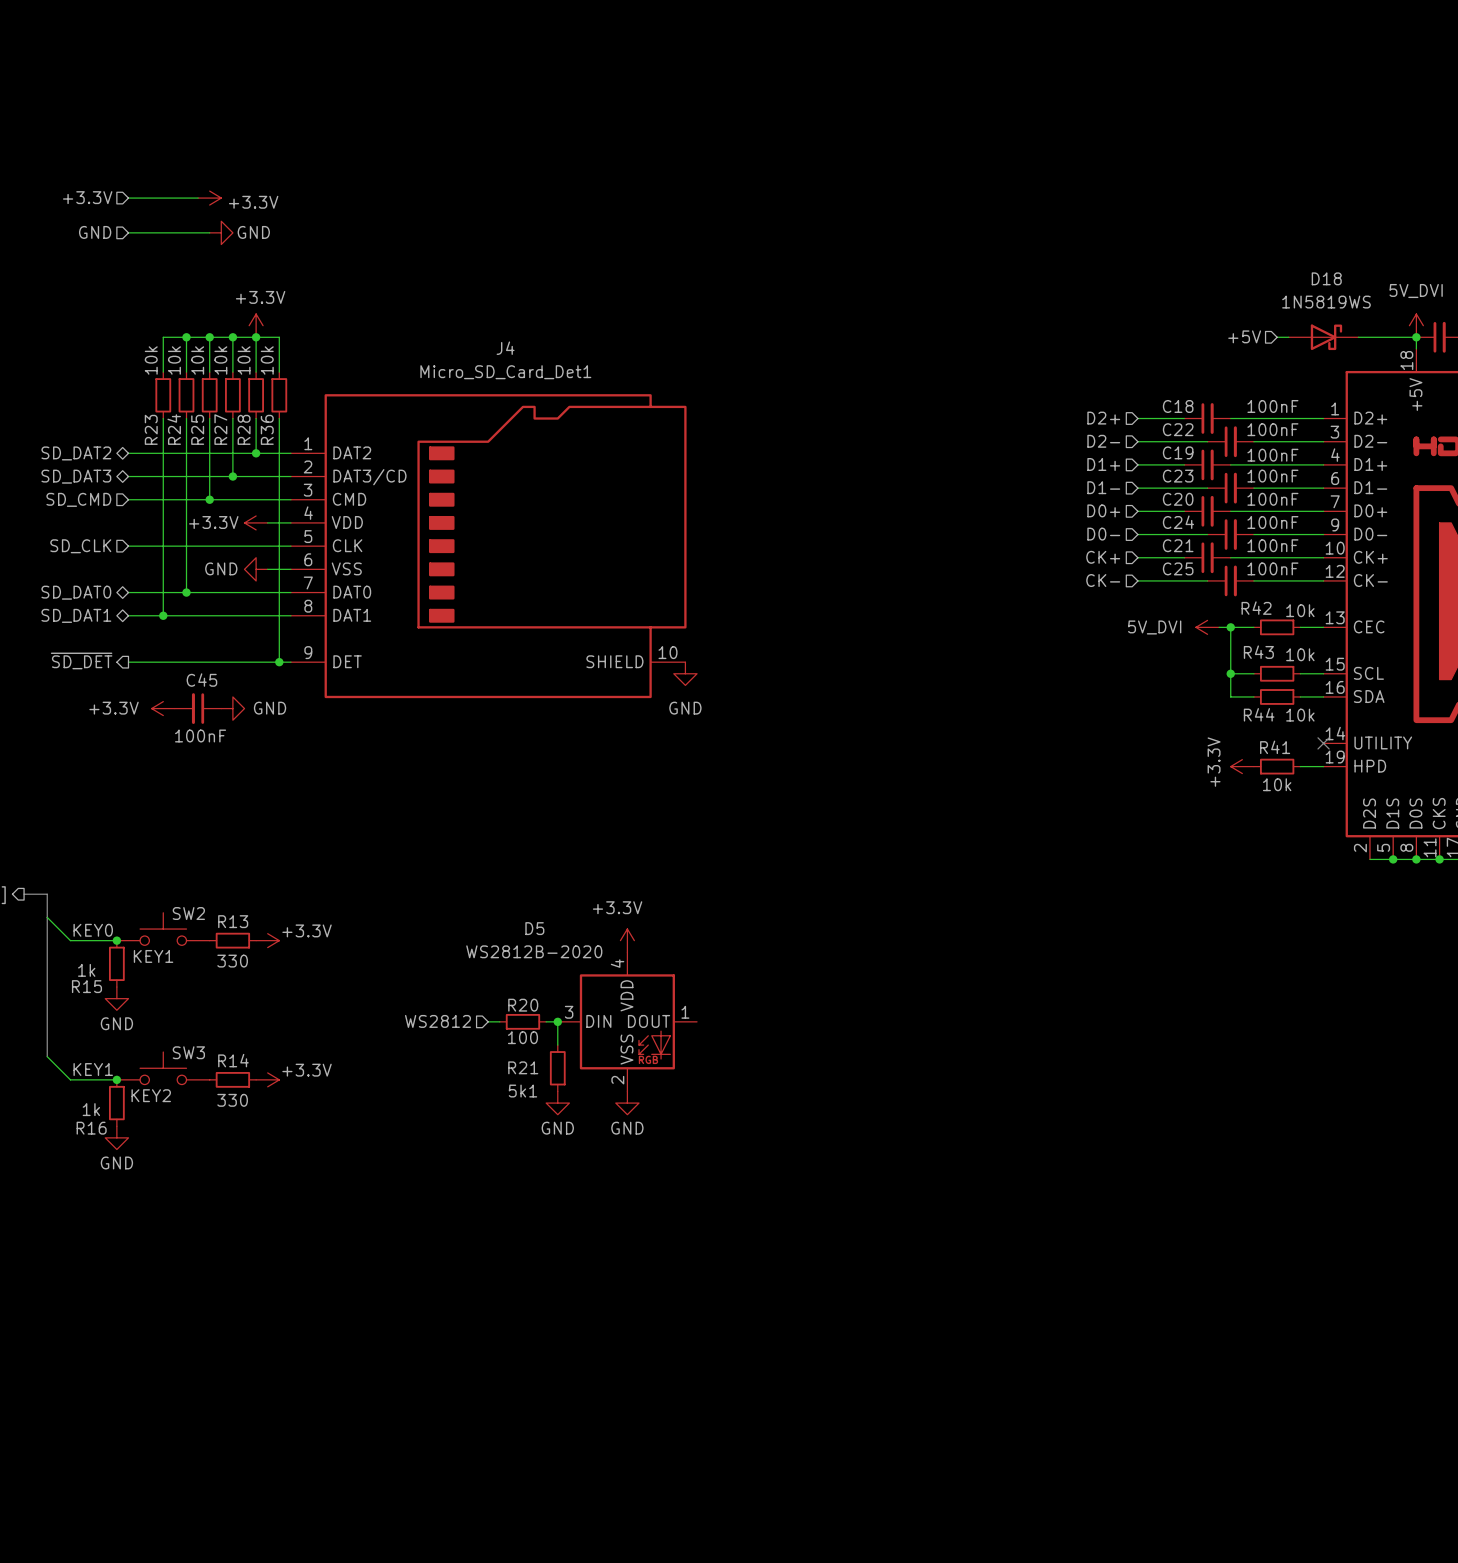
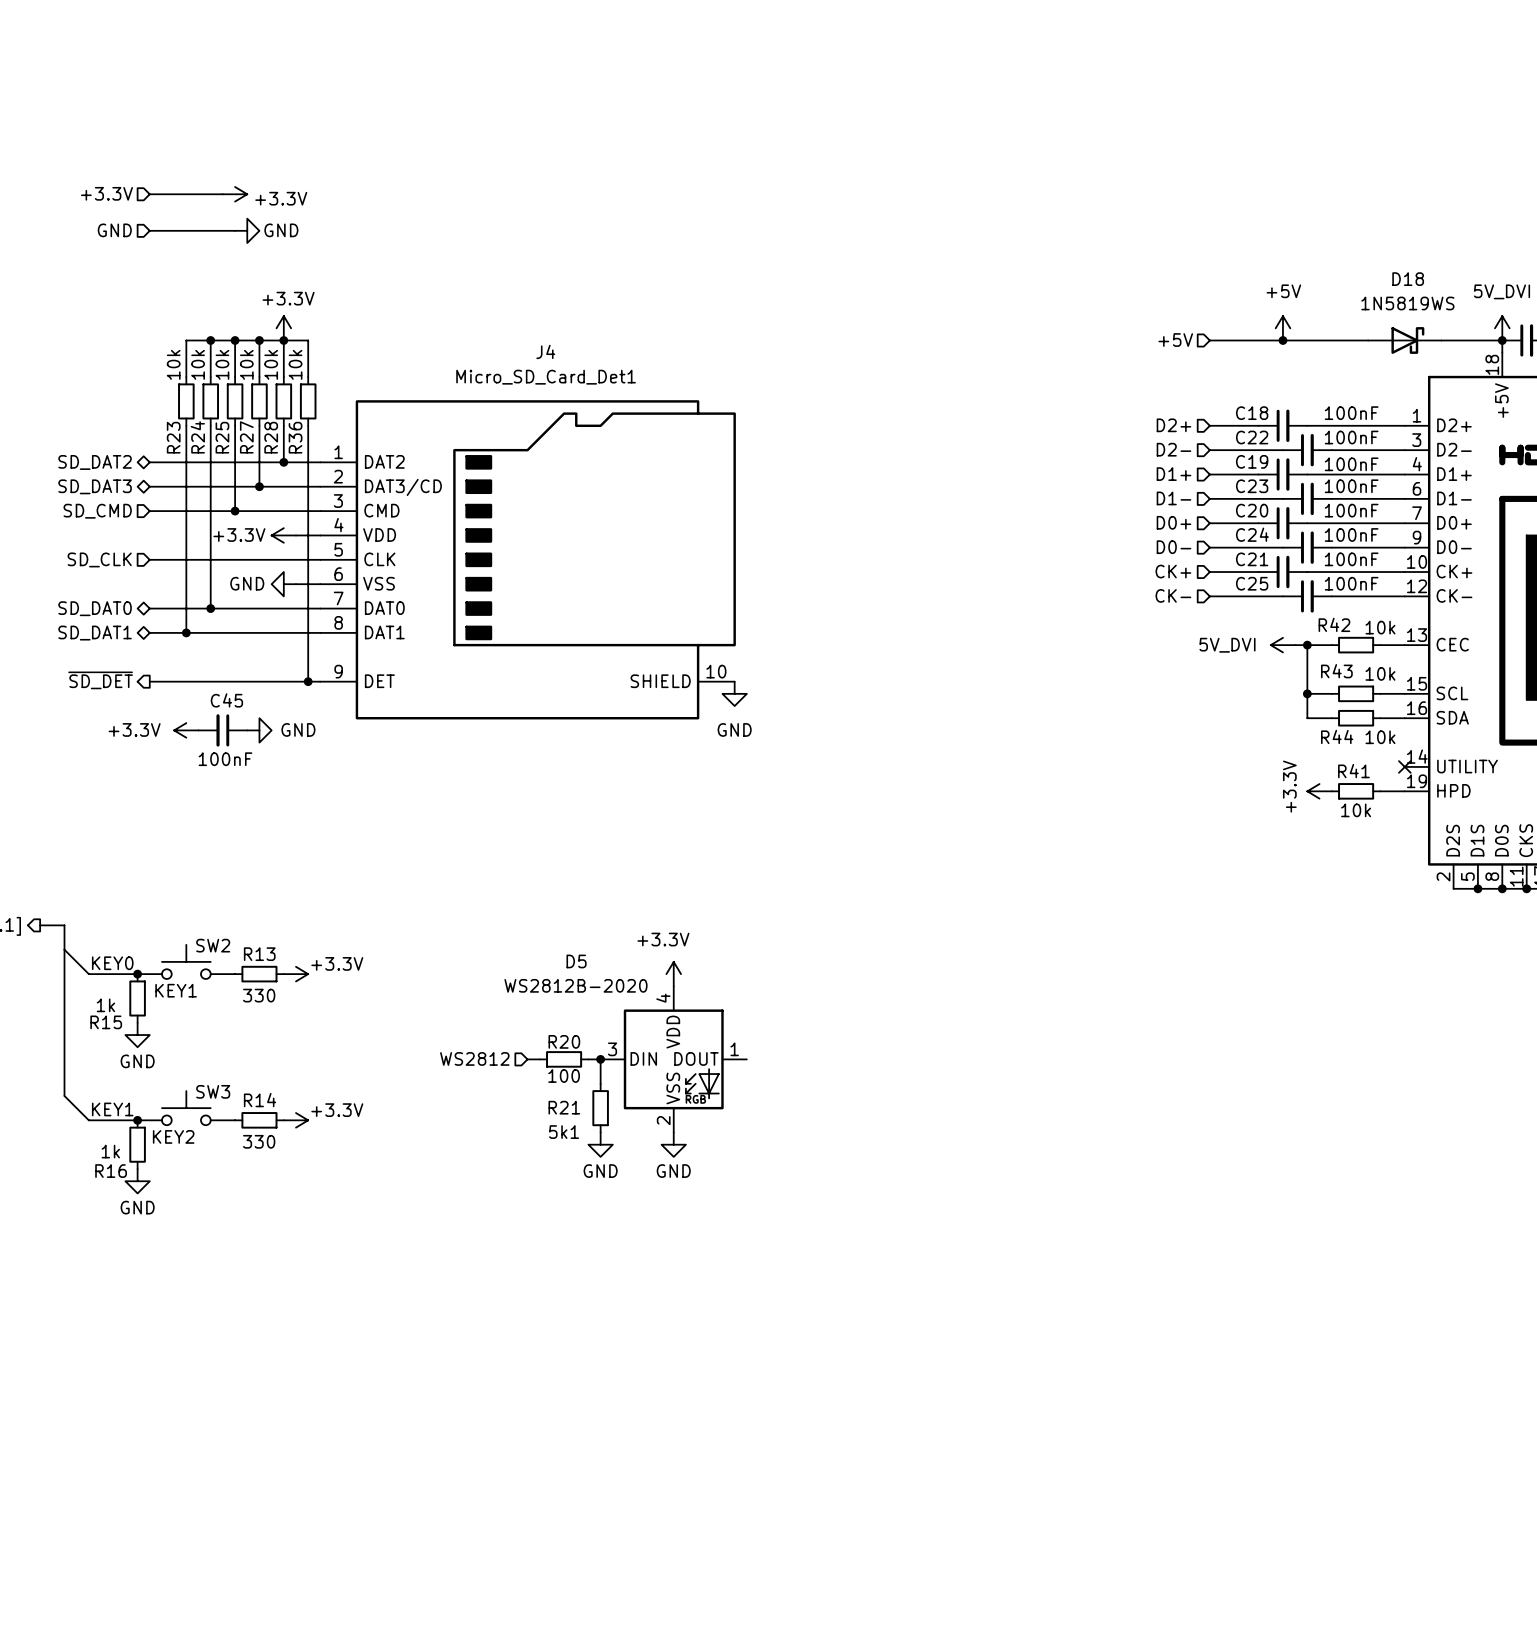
power symbol: none -> +5V (1282, 328)
hierarchical label position: +5V (1244, 336) -> +5V (1175, 340)
wire: none -> (1209, 340) (1356, 340)
junction: none -> (1282, 340)

